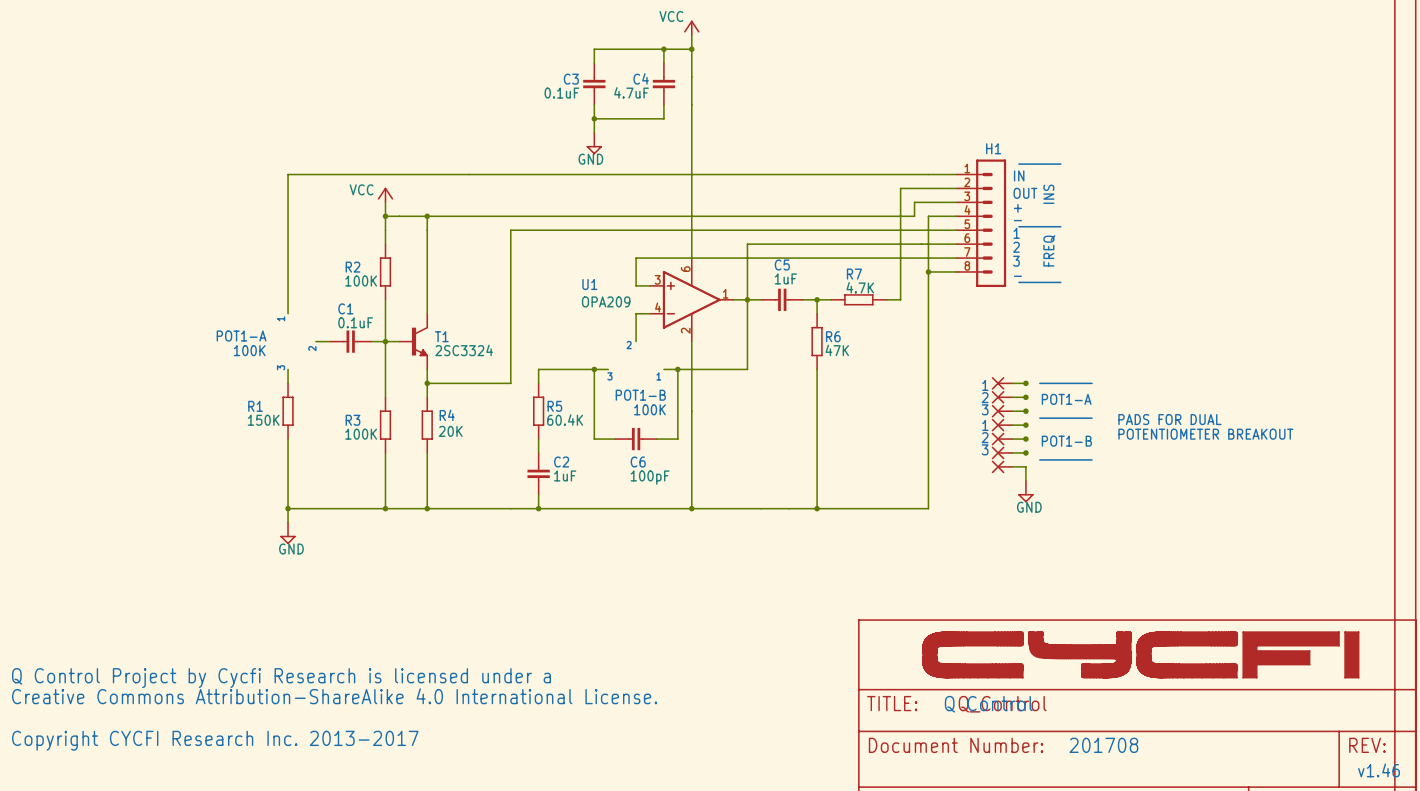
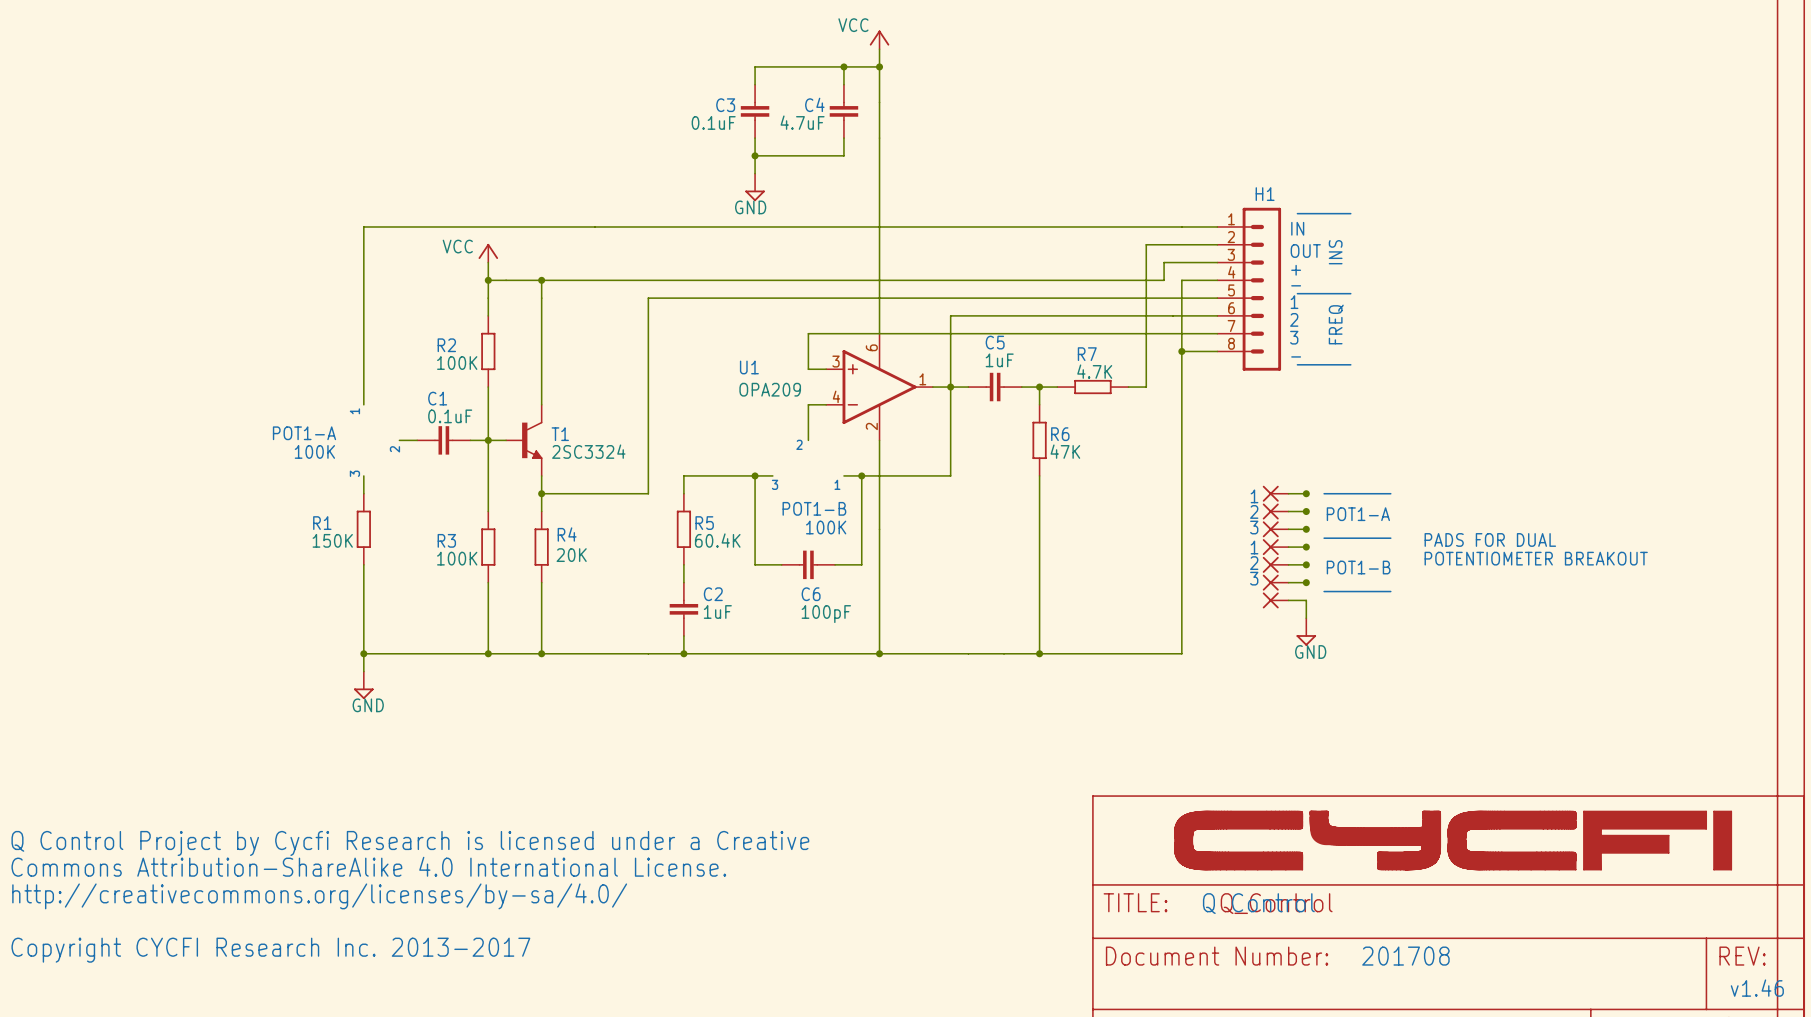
text: none -> Q Control Project by Cycfi Research is licensed under a Creative (410, 843)
text: Q Control Project by Cycfi Research is licensed under a (281, 678) -> Commons Attribution-ShareAlike 4.0 International License. (368, 866)
text: Creative Commons Attribution-ShareAlike 4.0 International License. (334, 696) -> http://creativecommons.org/licenses/by-sa/4.0/ (319, 896)

